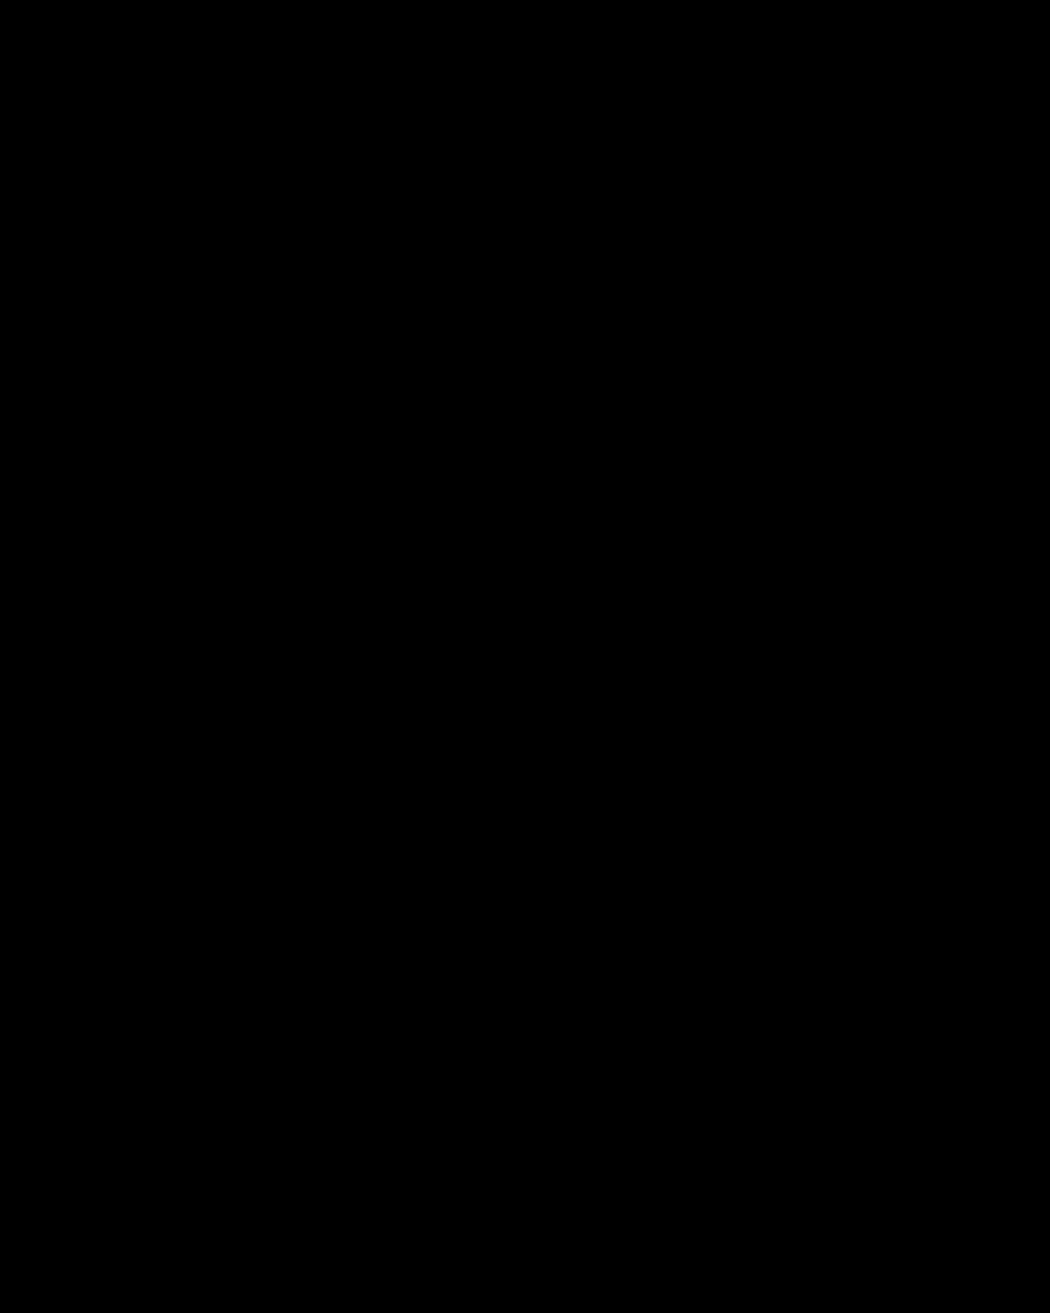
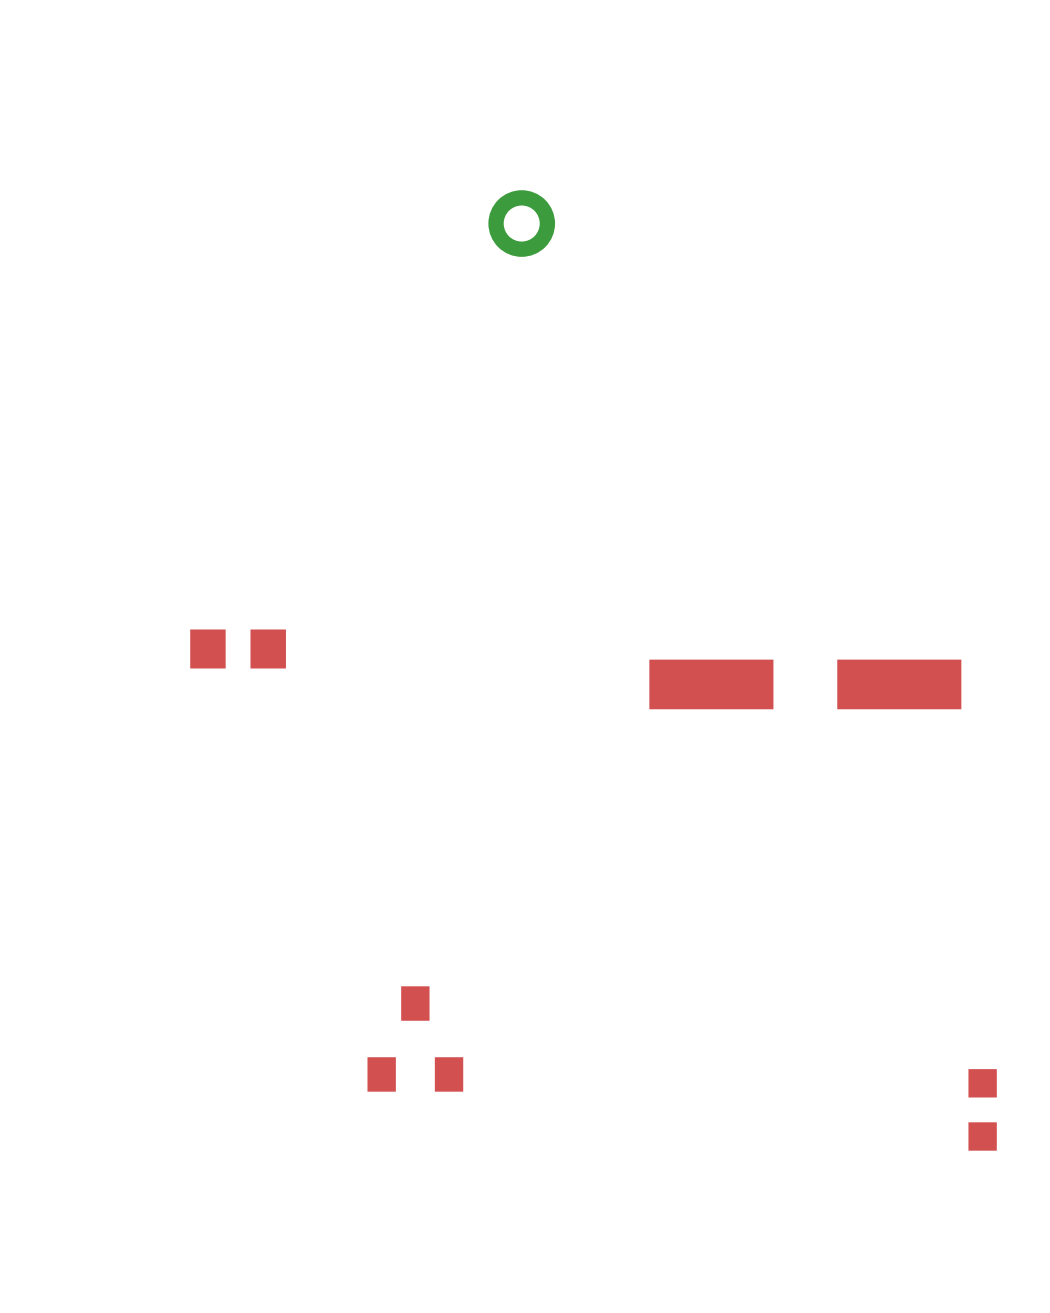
part: none -> (521, 223)
part: none -> (238, 648)
part: none -> (805, 684)
part: none -> (415, 1038)
part: none -> (982, 1109)

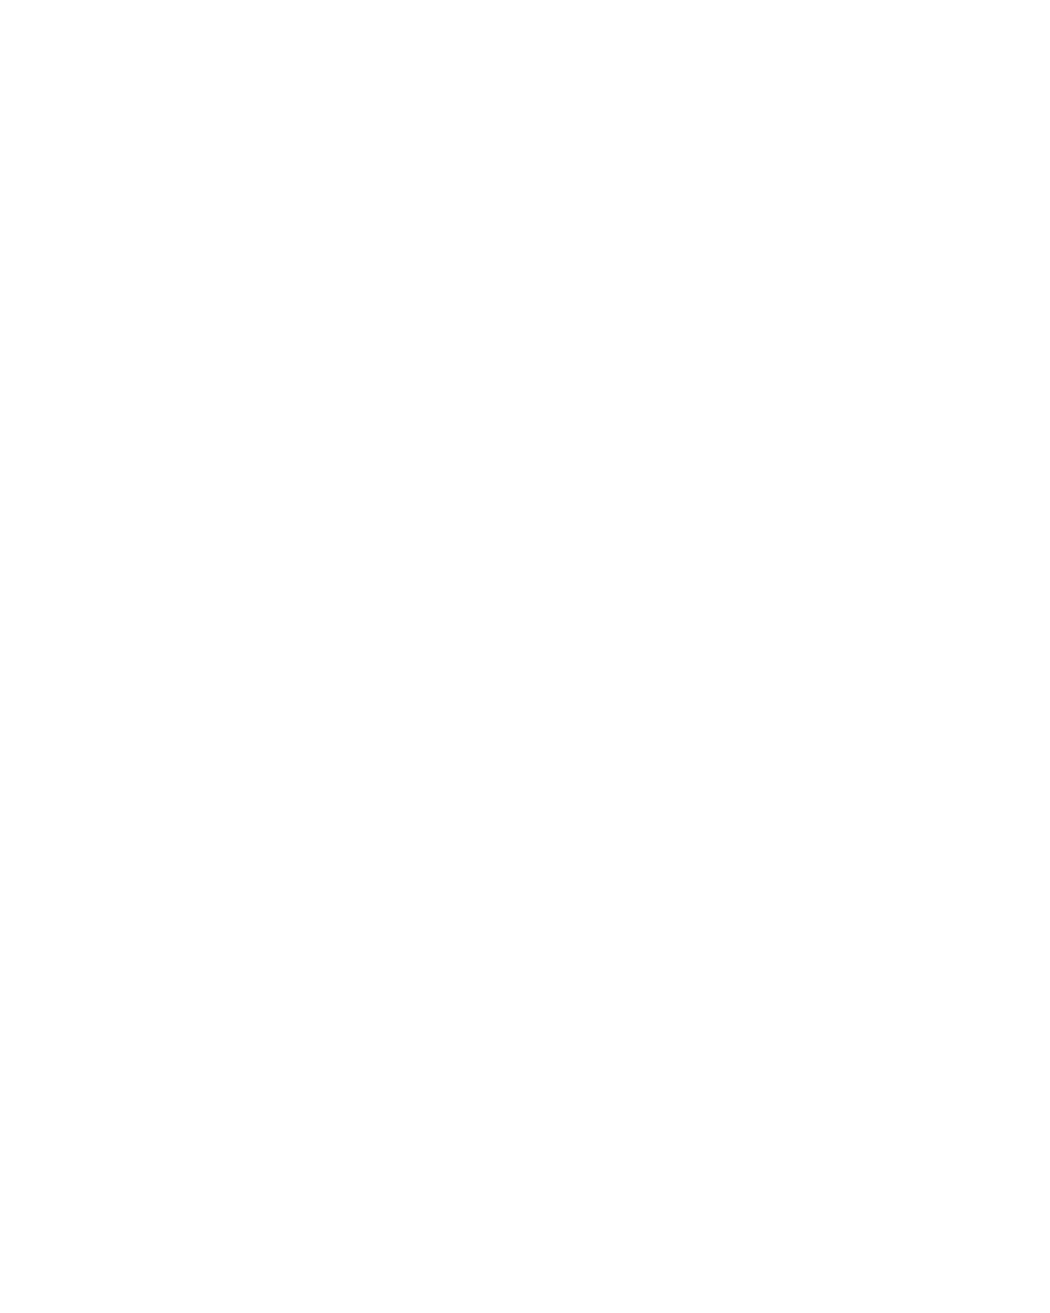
part: (521, 223) -> none
part: (238, 648) -> none
part: (805, 684) -> none
part: (415, 1038) -> none
part: (982, 1109) -> none

